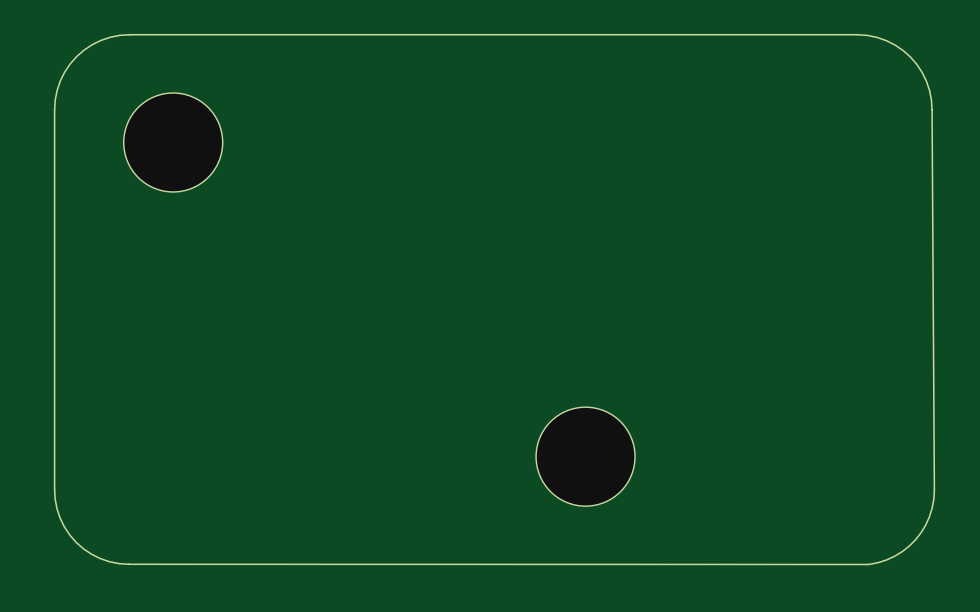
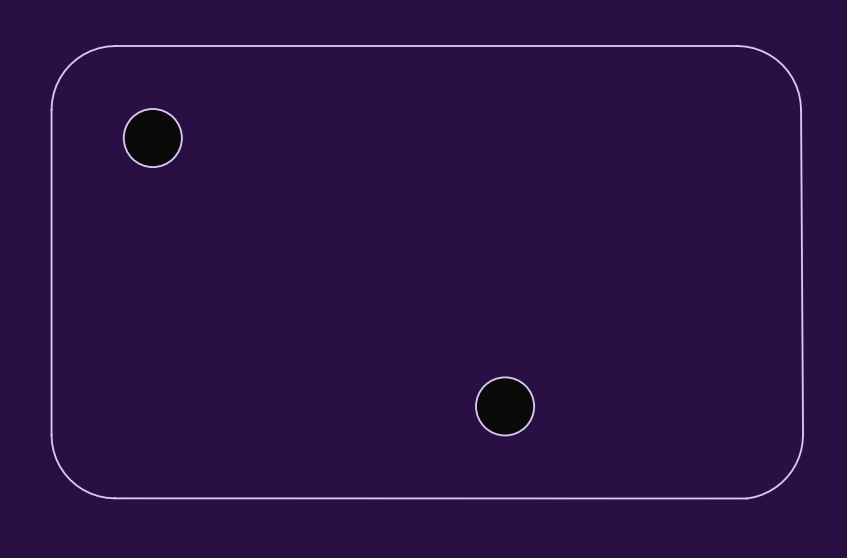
part footprint: [123, 93, 223, 192] -> [123, 108, 182, 168]
part footprint: [536, 407, 636, 507] -> [476, 377, 535, 436]

